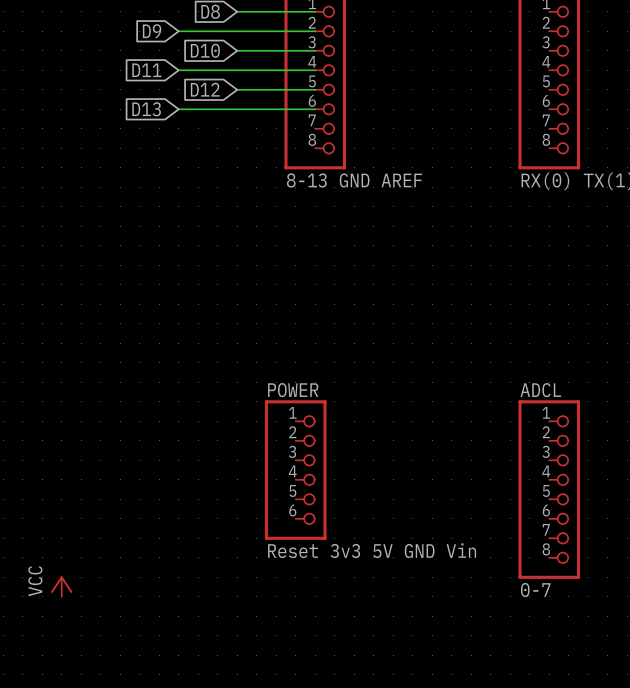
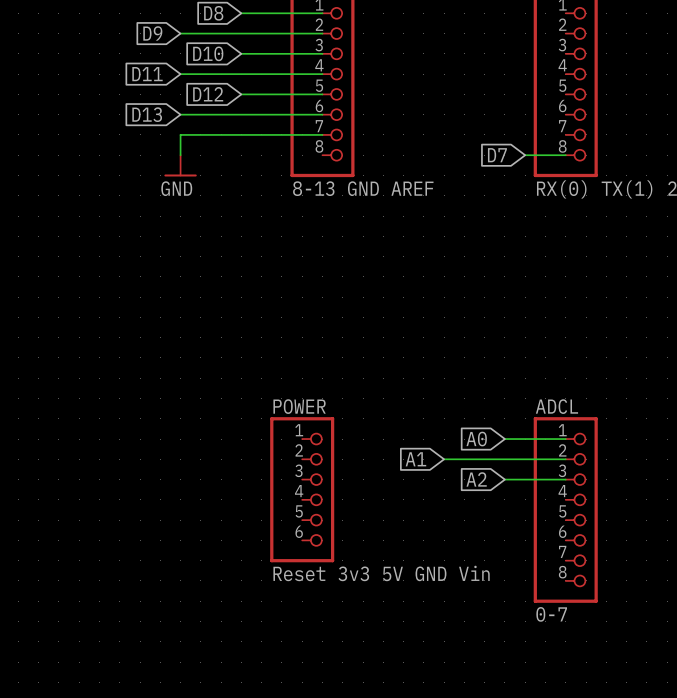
wire: none -> (322, 134) (180, 134) (180, 155)
global label: none -> D7 (497, 155)
wire: none -> (525, 155) (565, 155)
power symbol: none -> GND (180, 165)
global label: none -> A0 (476, 439)
wire: none -> (504, 439) (565, 439)
global label: none -> A1 (415, 459)
wire: none -> (444, 459) (565, 459)
global label: none -> A2 (476, 479)
wire: none -> (504, 479) (565, 479)
power symbol: VCC (61, 586) -> none

